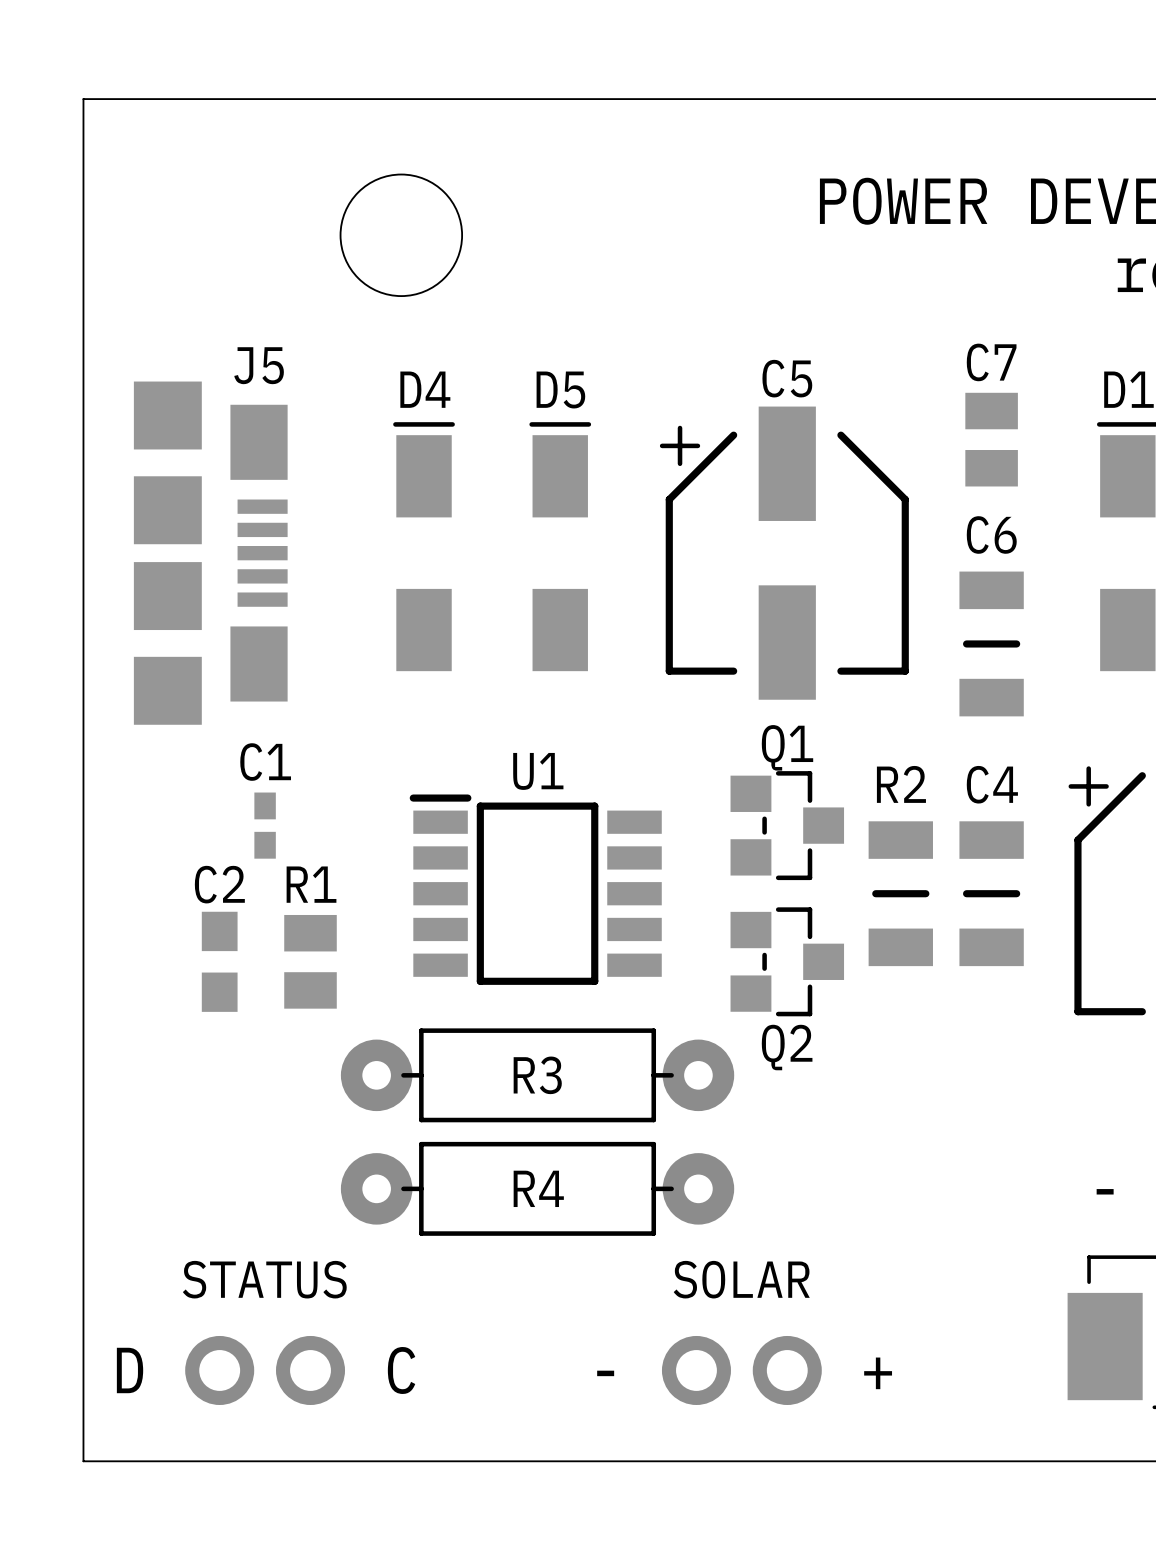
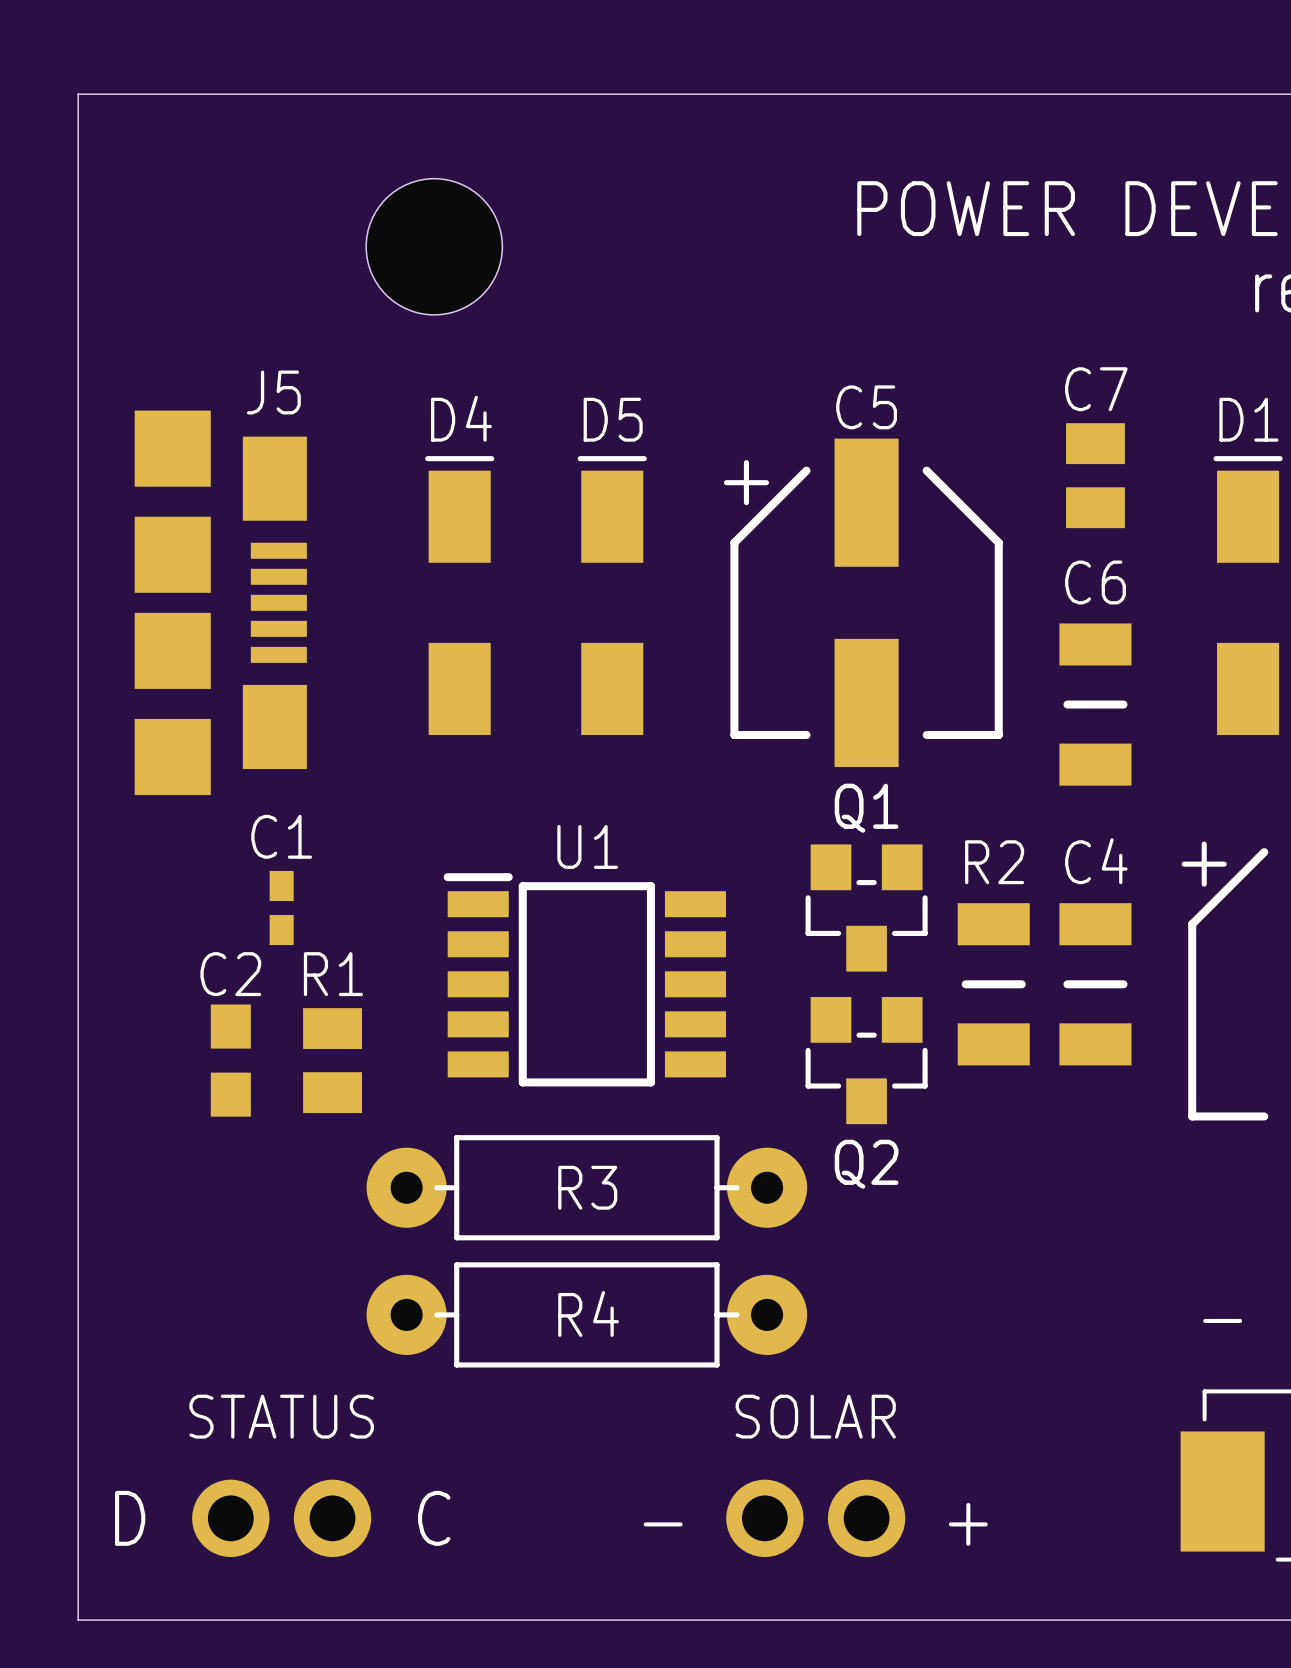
Q1 rotation: 0° (787, 825) -> 90° clockwise (866, 908)
Q2 rotation: 0° (787, 961) -> 90° clockwise (866, 1060)

